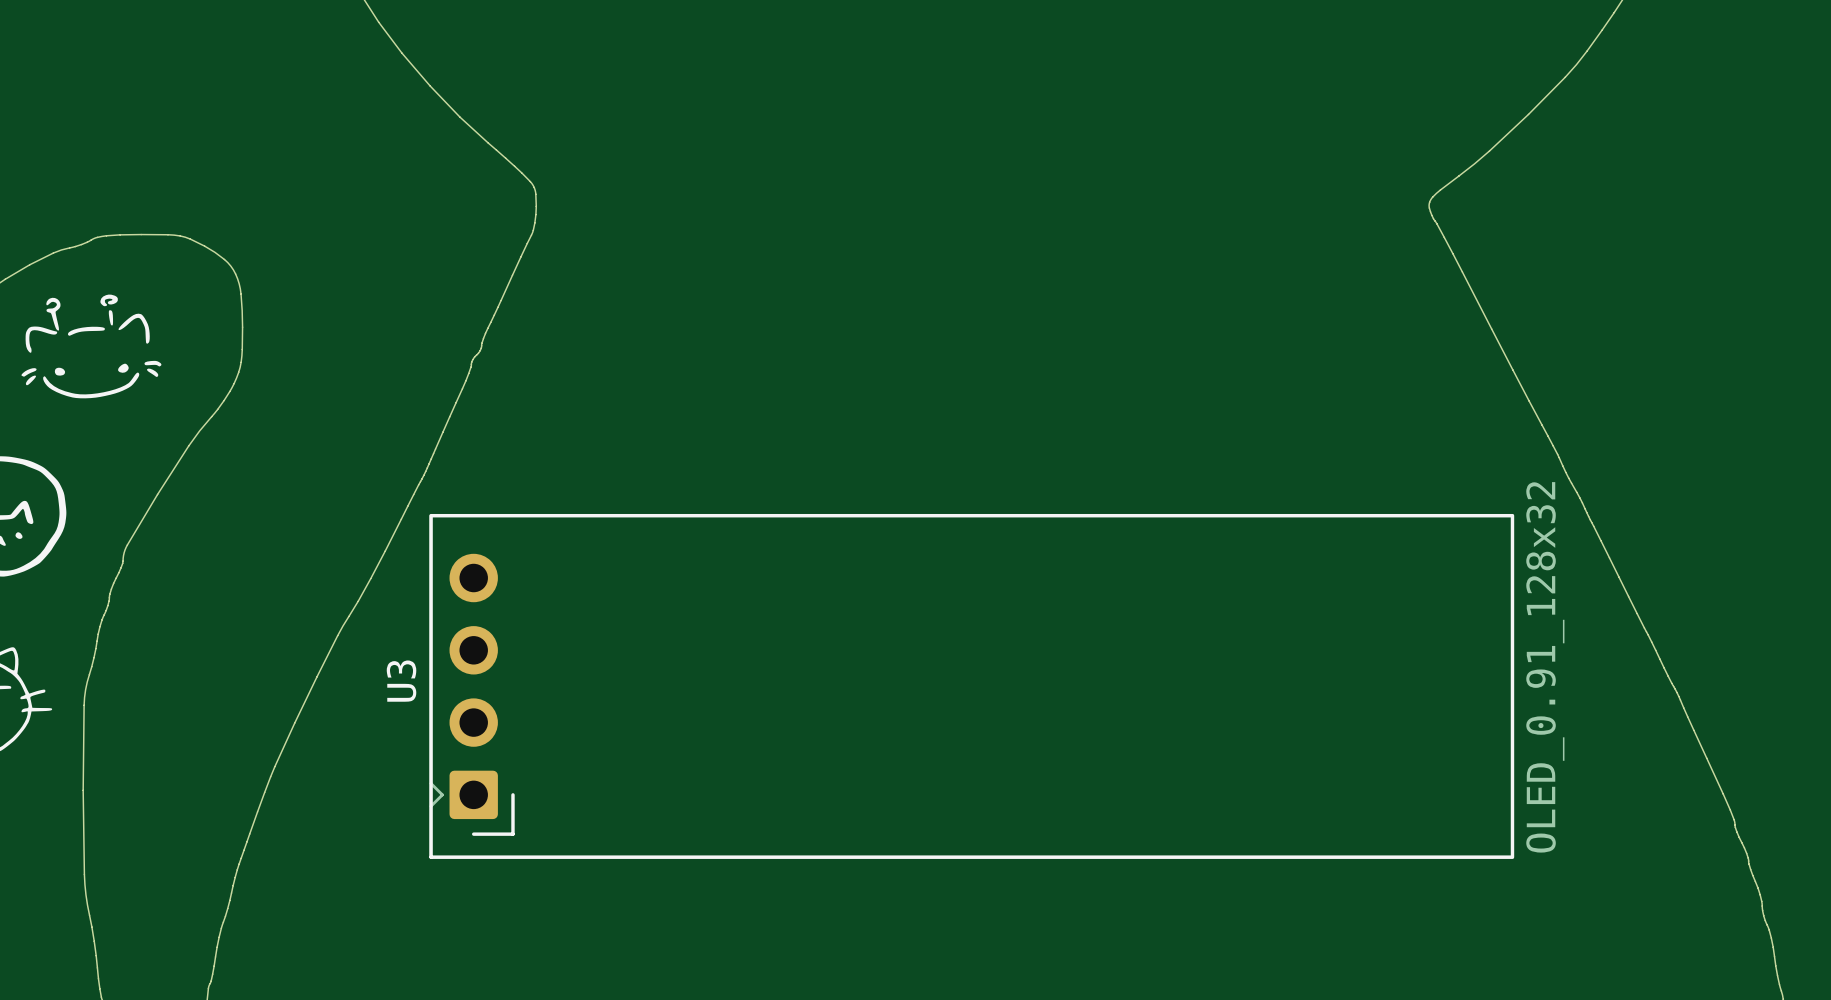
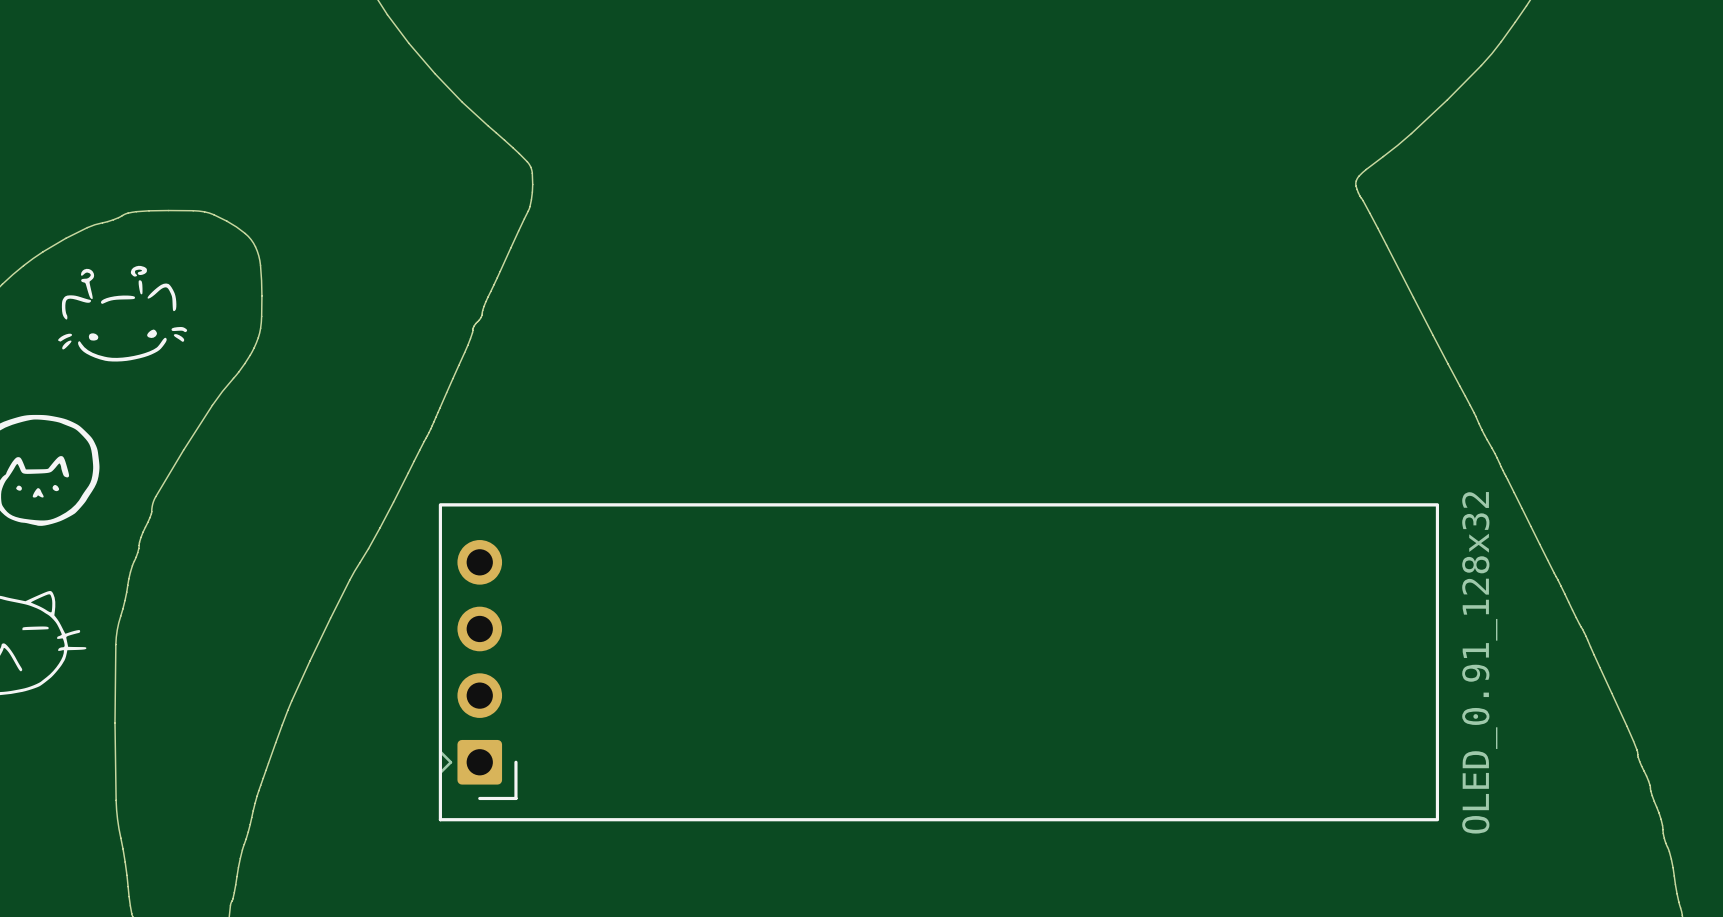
U3: OLED_0.91_128x32 (971, 686) -> none
part: none -> OLED_0.91_128x32 (938, 662)

